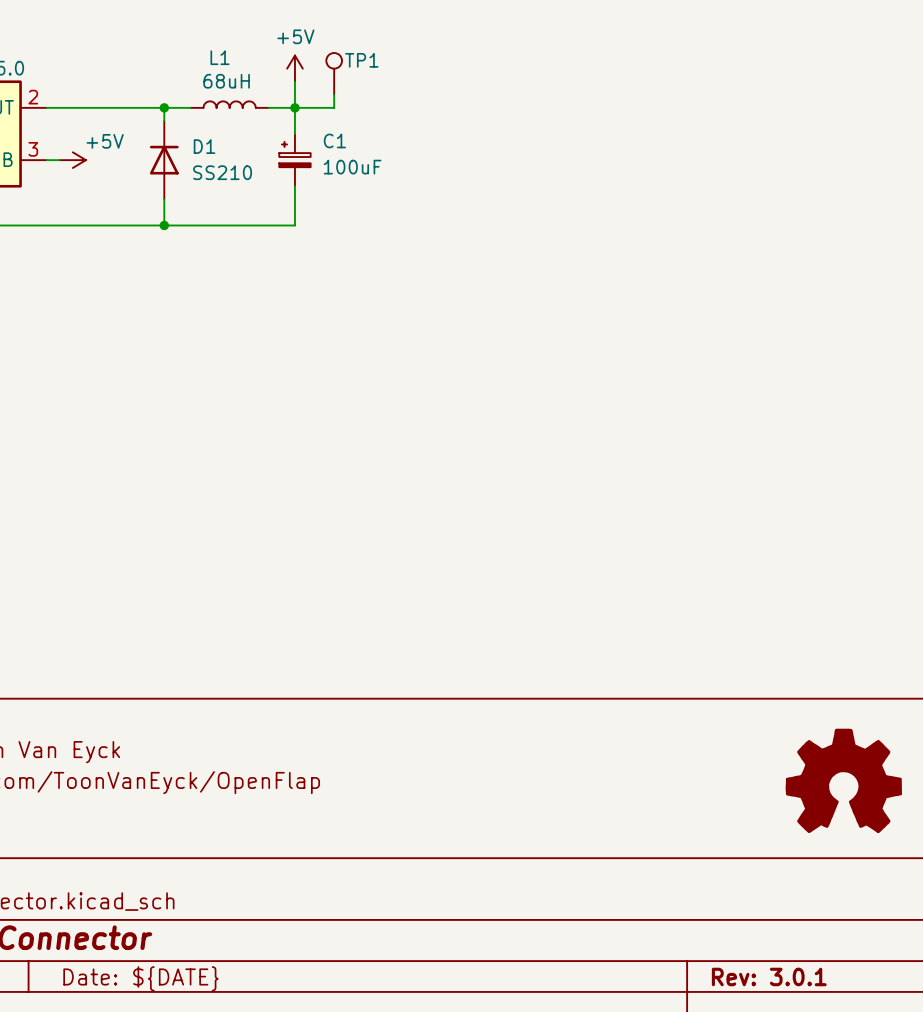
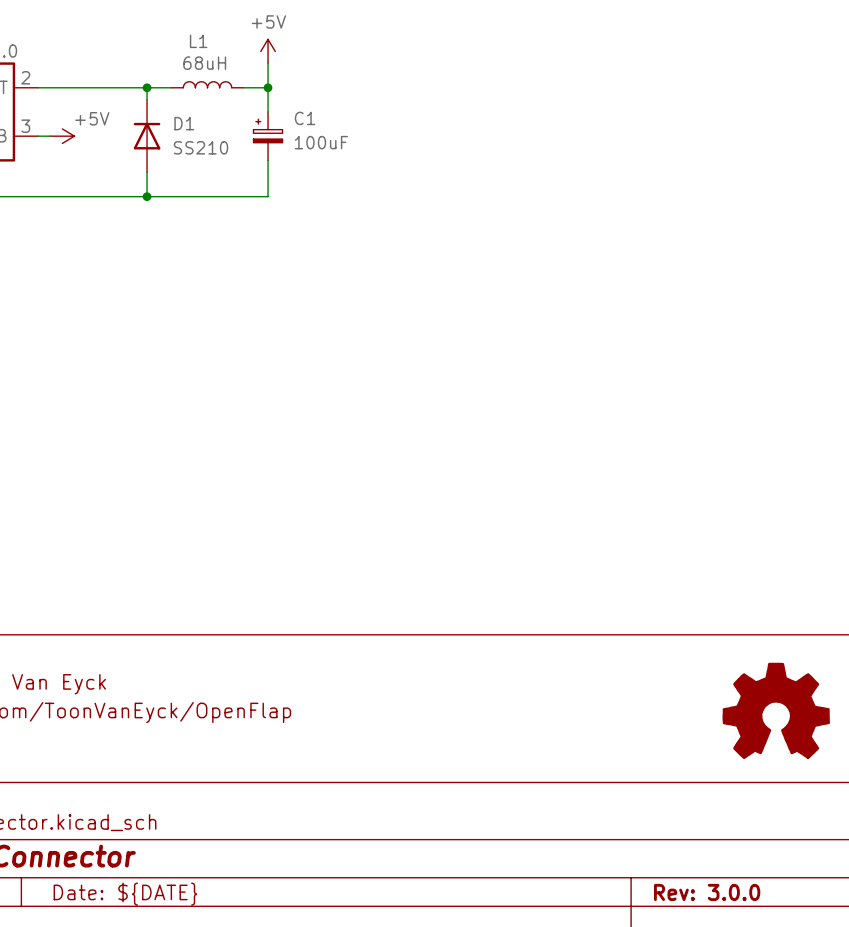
TP1: (334, 73) -> none
wire: (334, 94) (334, 107) (294, 107) -> none
title block: Rev: 3.0.1 (769, 976) -> Rev: 3.0.0 (707, 892)

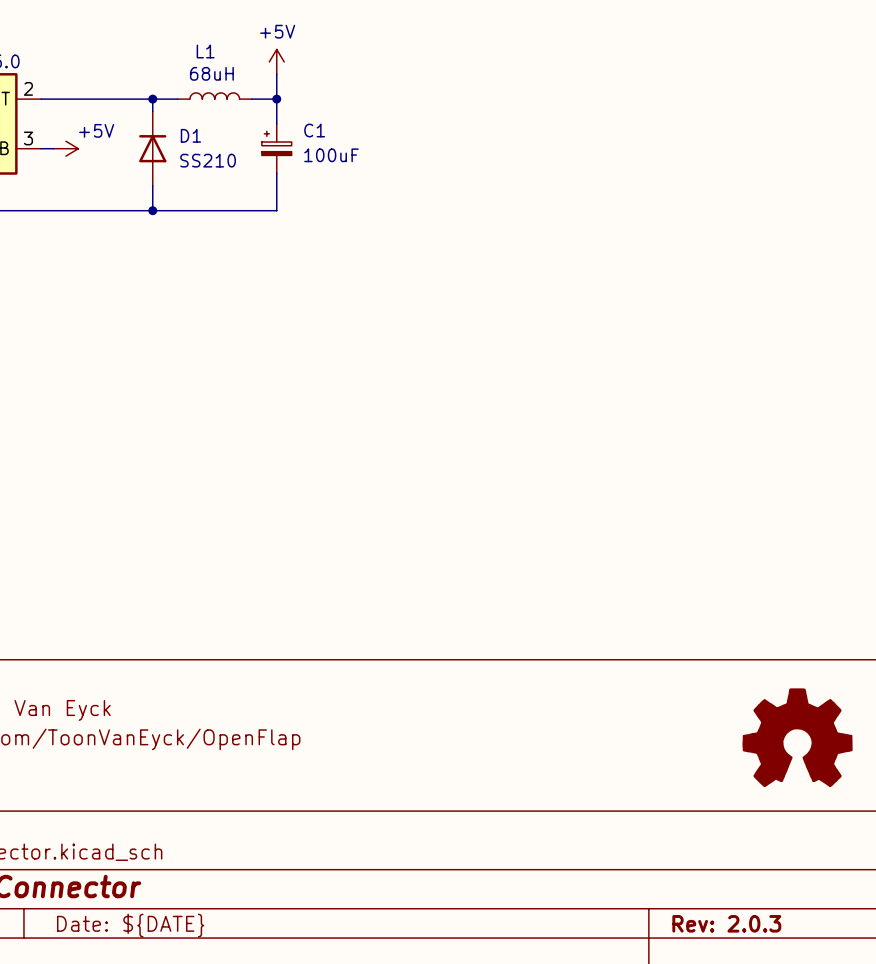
title block: Rev: 3.0.0 (707, 892) -> Rev: 2.0.3 (726, 923)

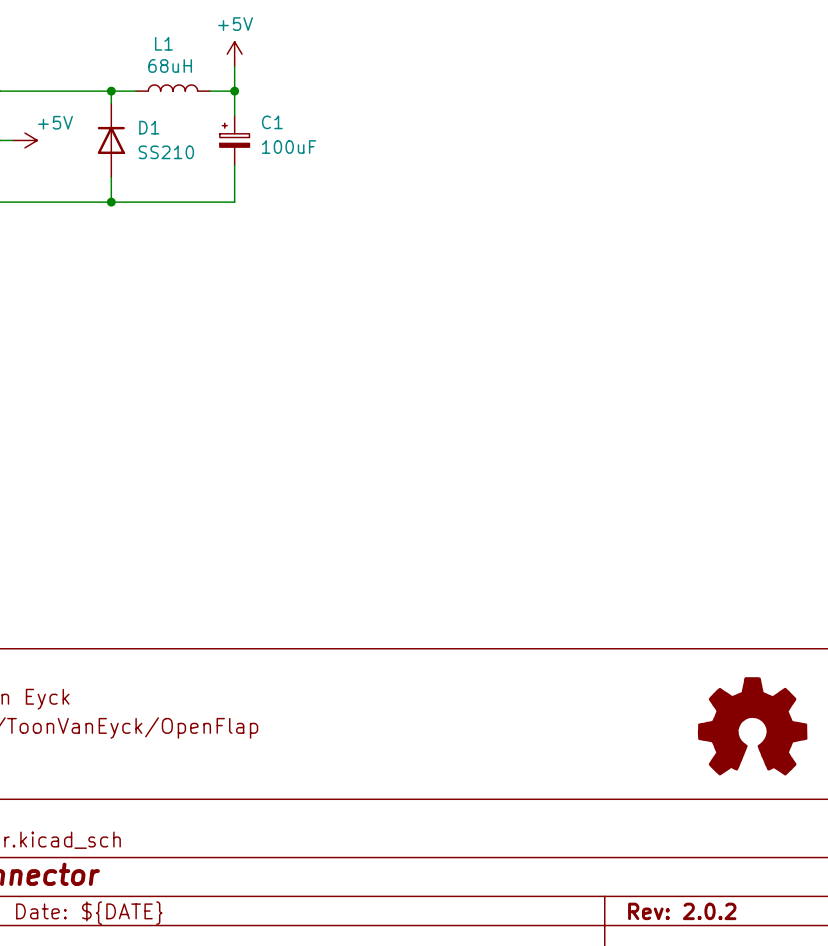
title block: Rev: 2.0.3 (726, 923) -> Rev: 2.0.2 (682, 911)

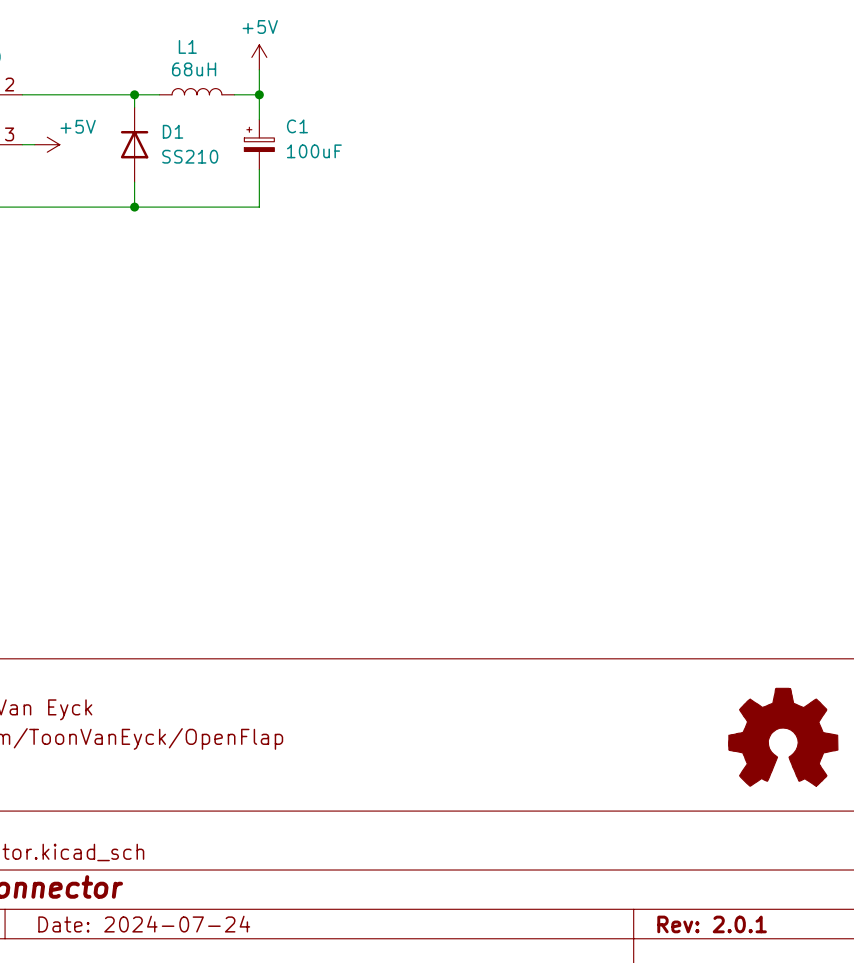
title block: Rev: 2.0.2 (682, 911) -> Rev: 2.0.1 (712, 924)
title block: Date: ${DATE} (89, 913) -> Date: 2024-07-24 (144, 924)

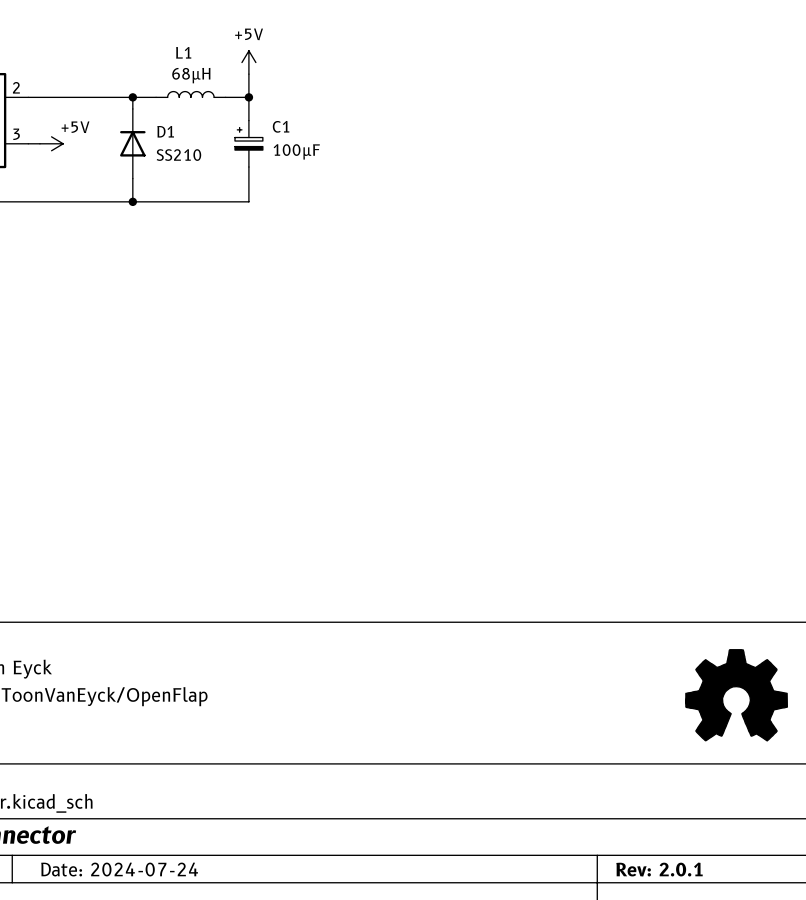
L1 value: 68uH (194, 69) -> 68µH (191, 75)
C1 value: 100uF (314, 151) -> 100µF (296, 151)

